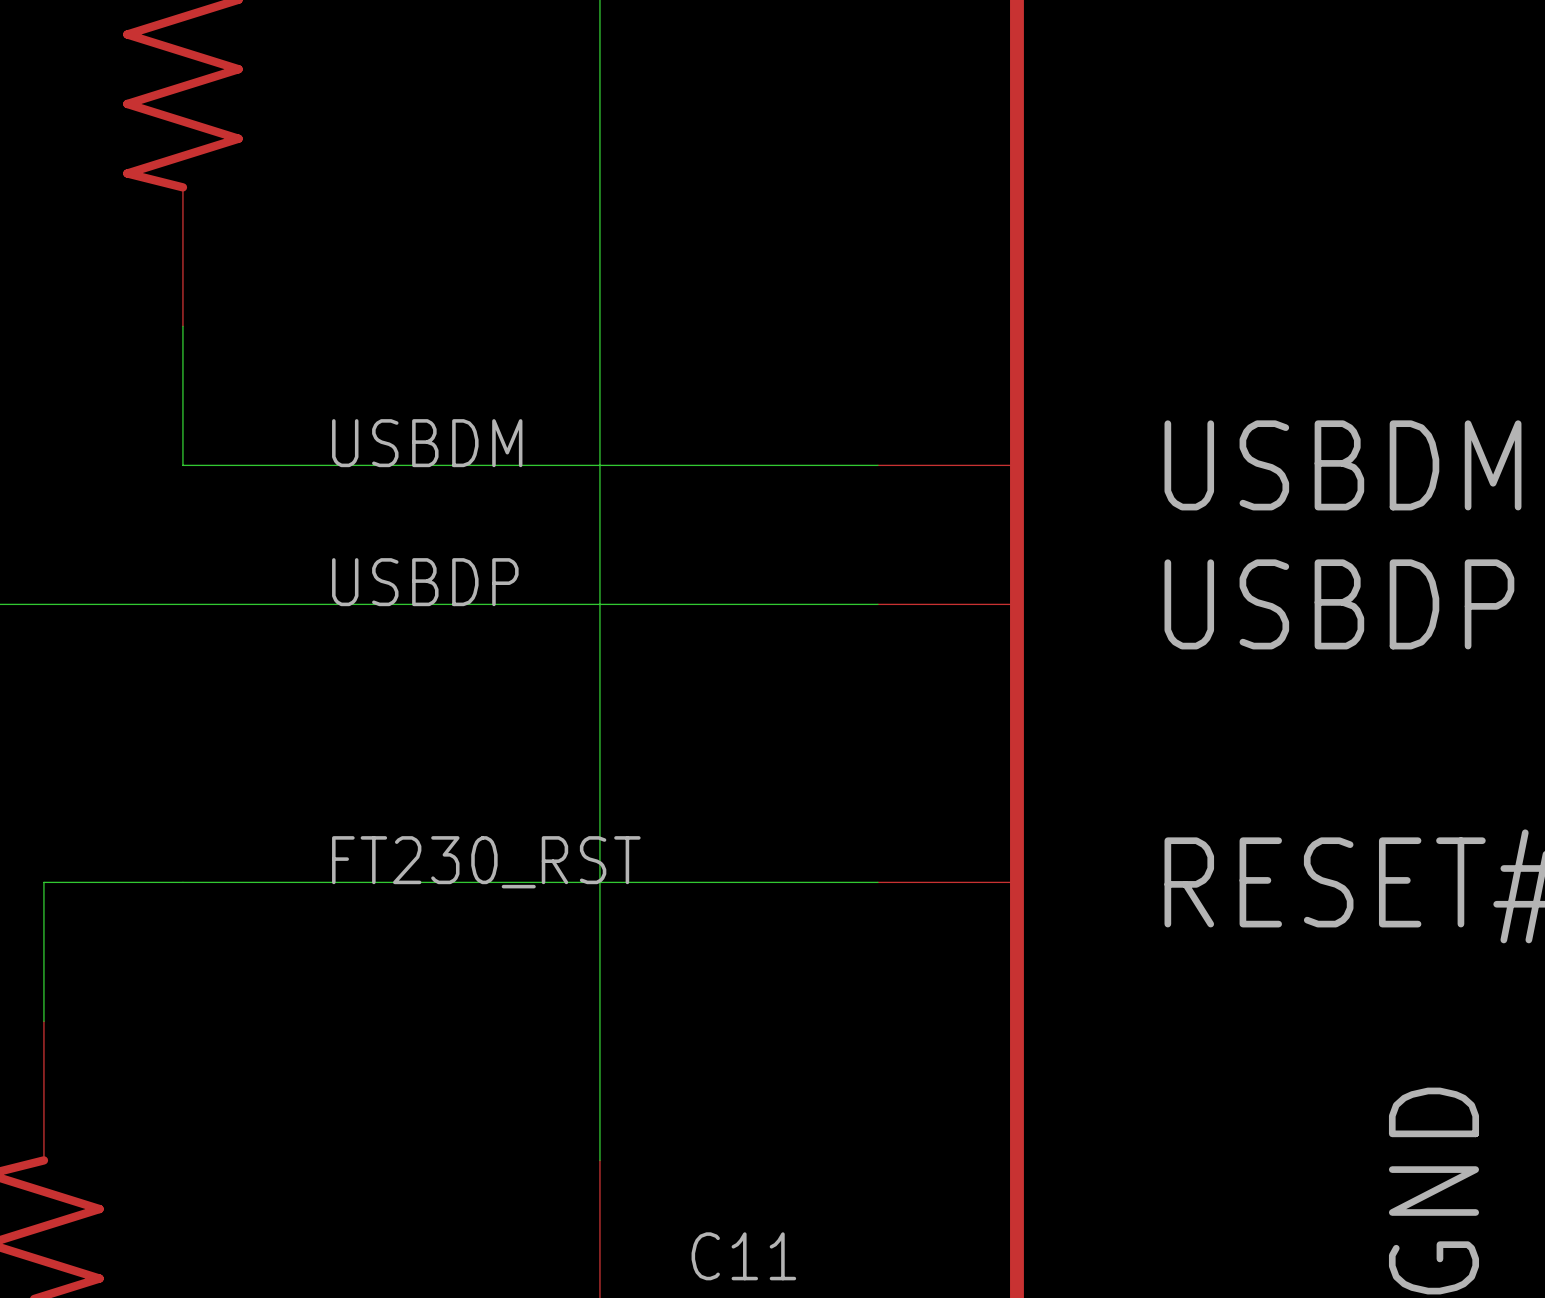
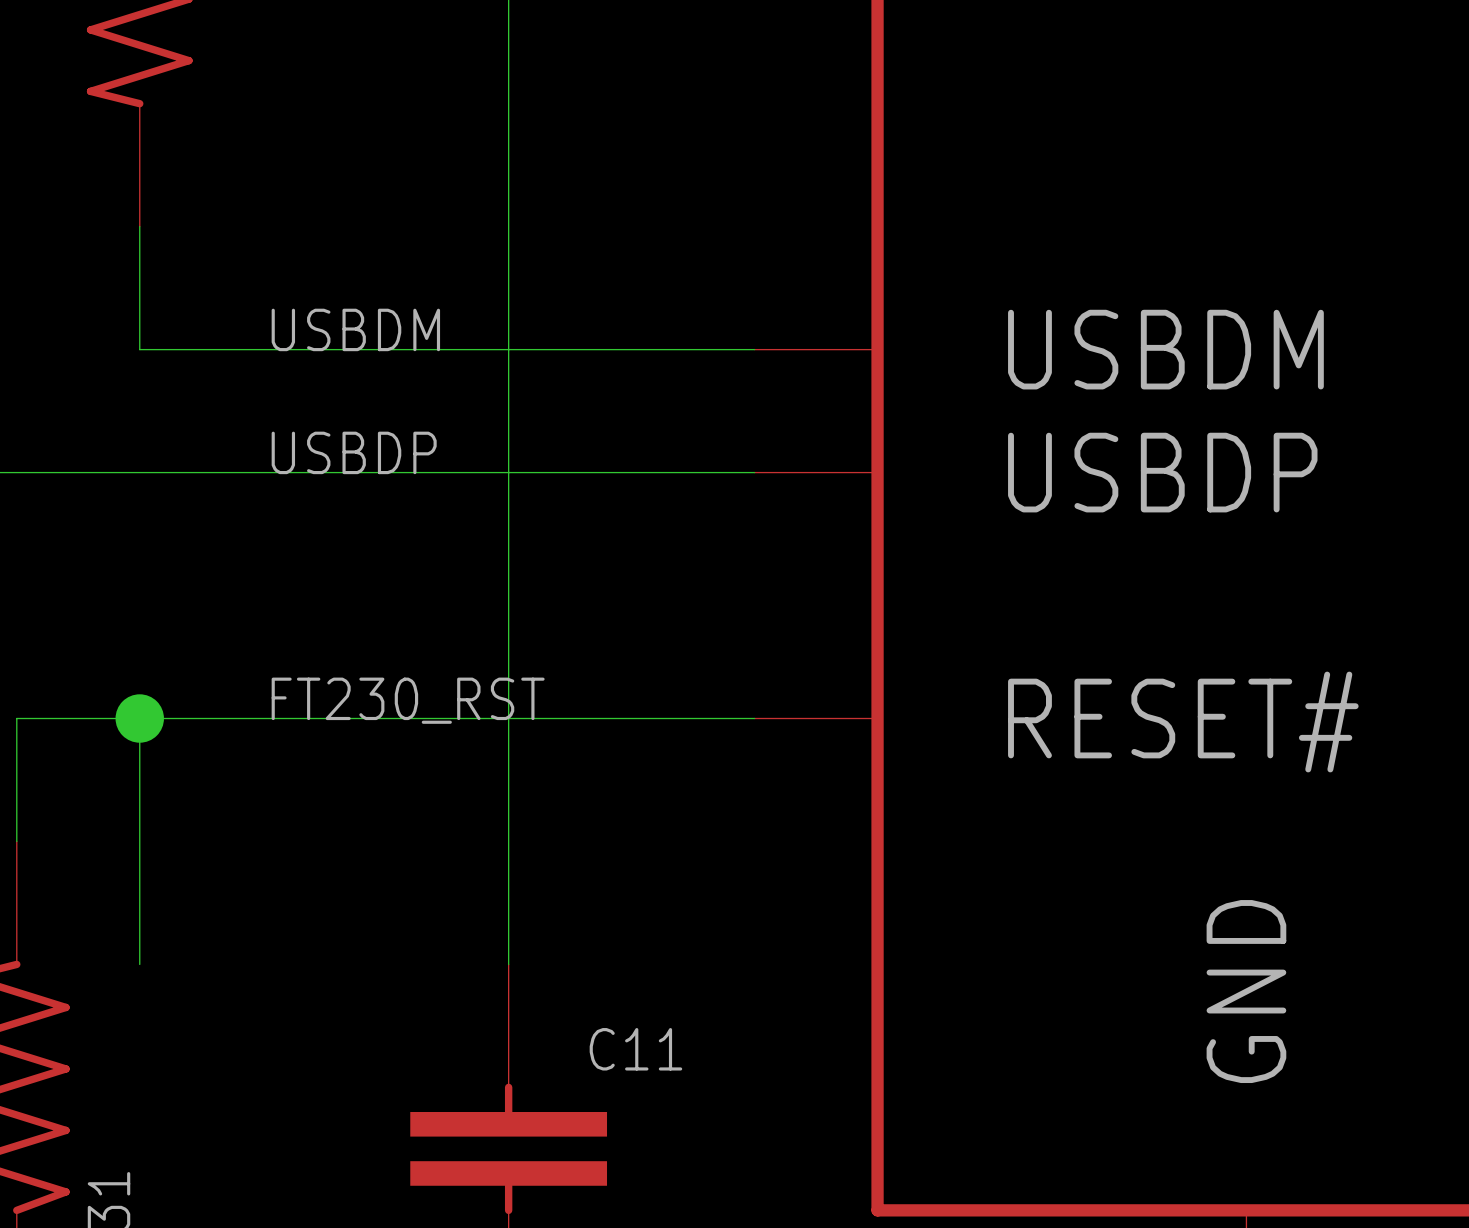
wire: none -> (139, 718) (139, 964)
junction: none -> (139, 718)

